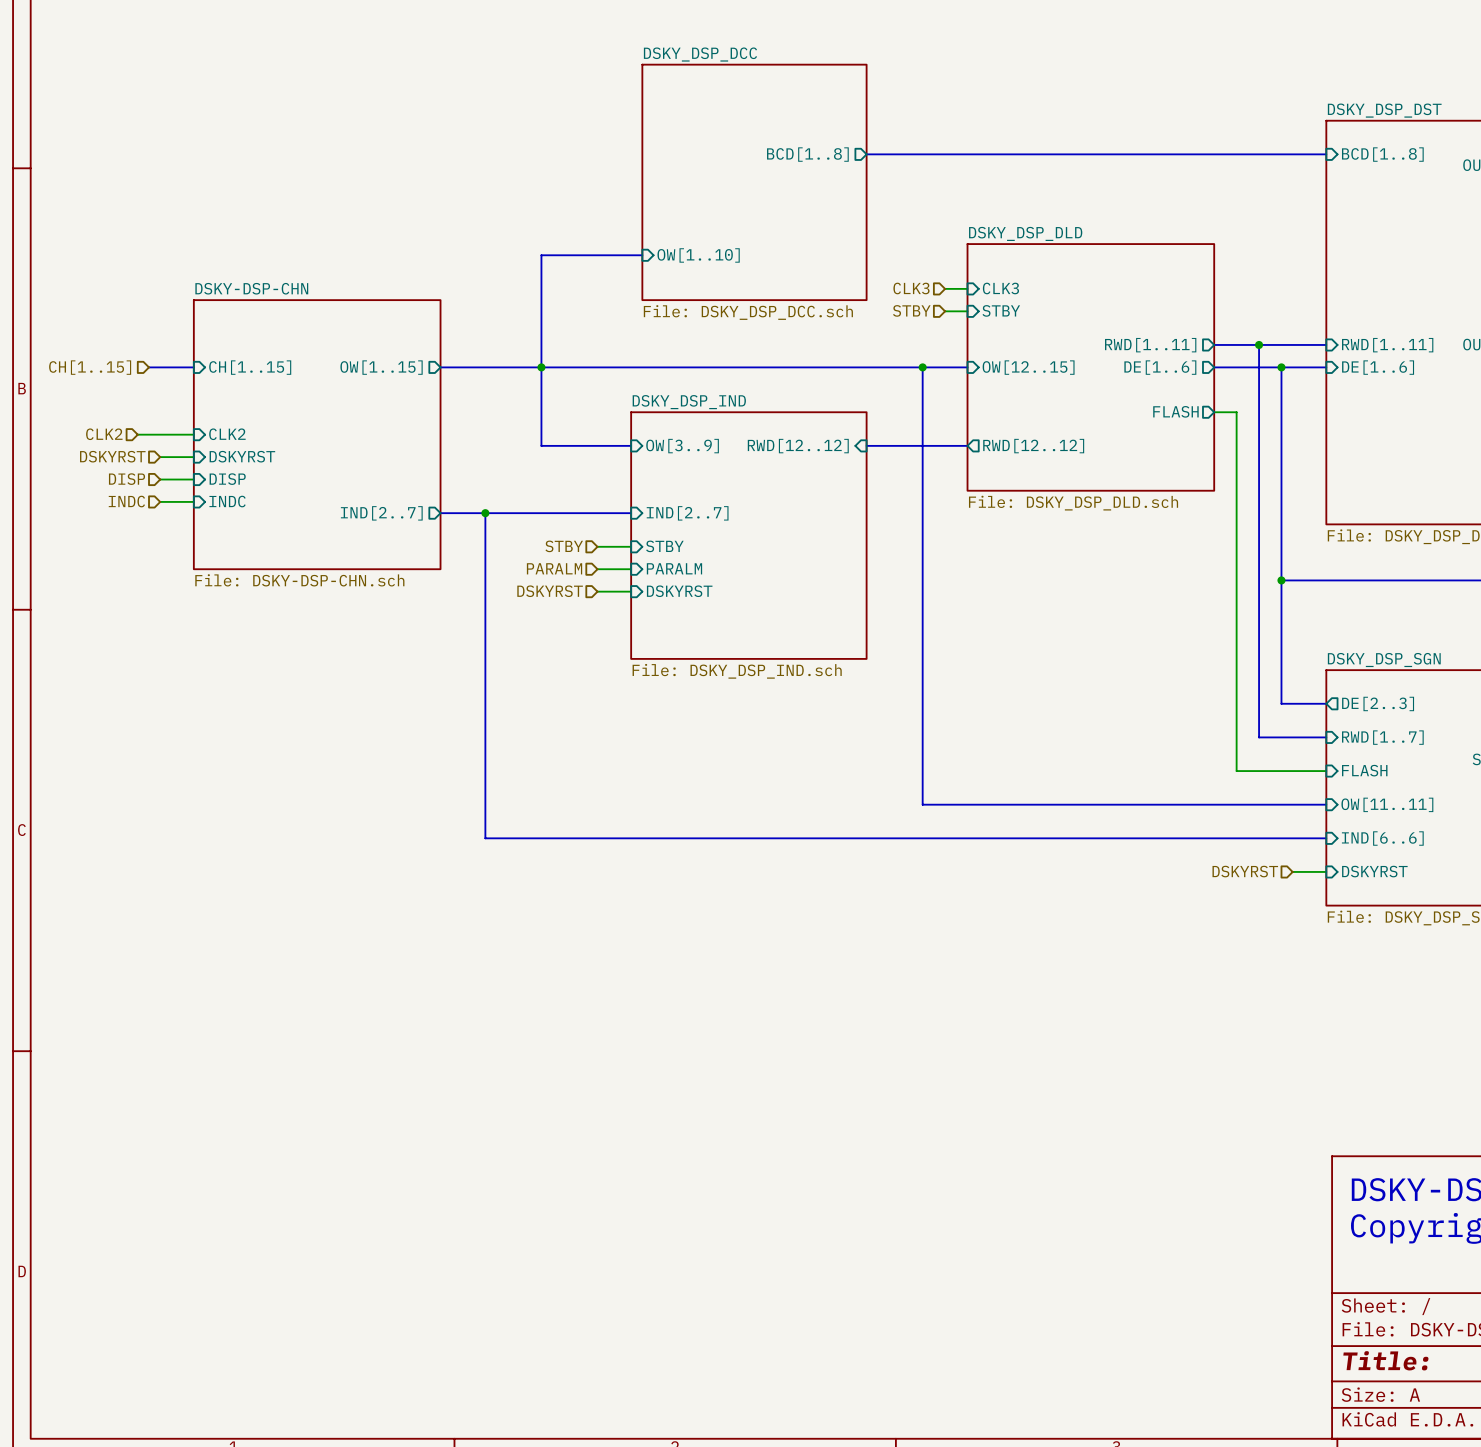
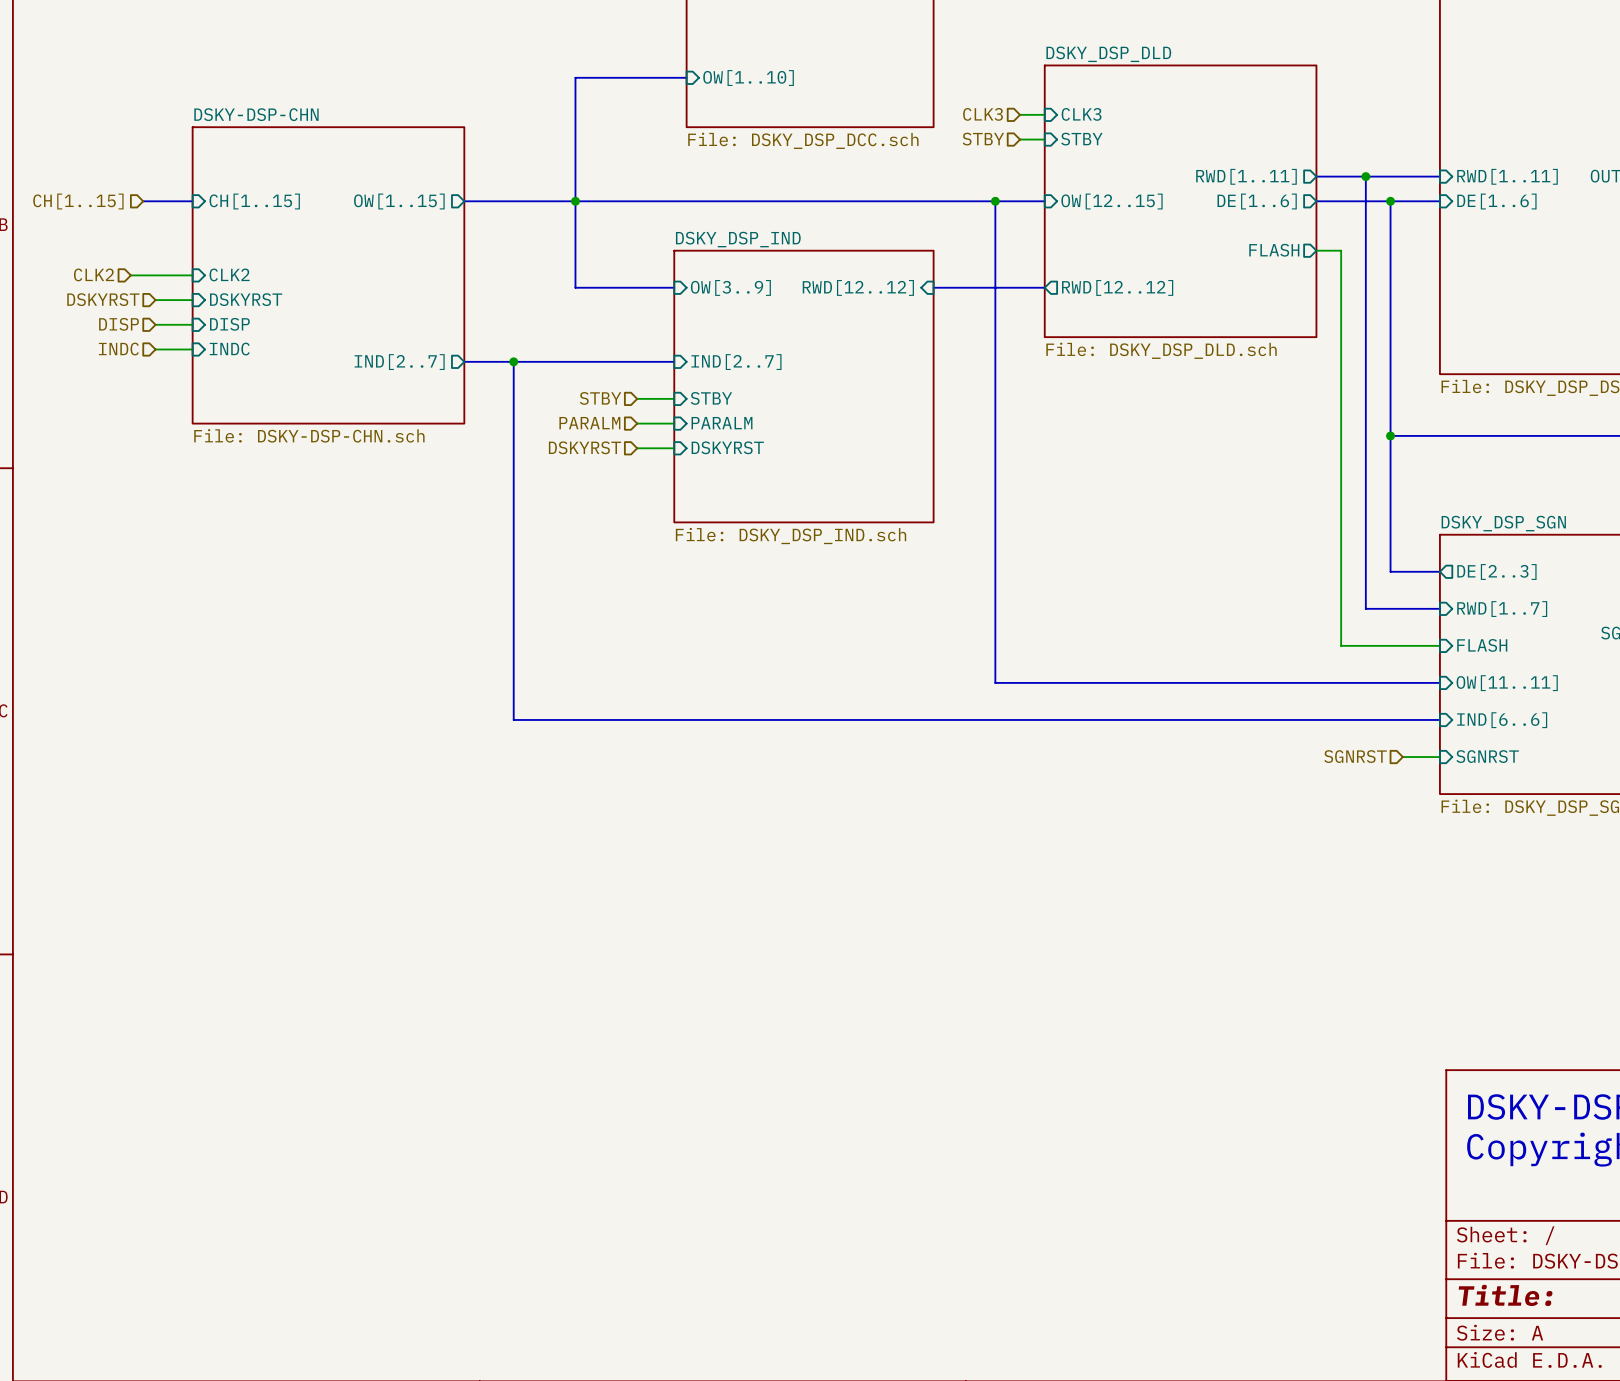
hierarchical label: DSKYRST (1245, 871) -> SGNRST (1355, 756)
sheet pin: DSKYRST (1374, 871) -> SGNRST (1487, 756)

